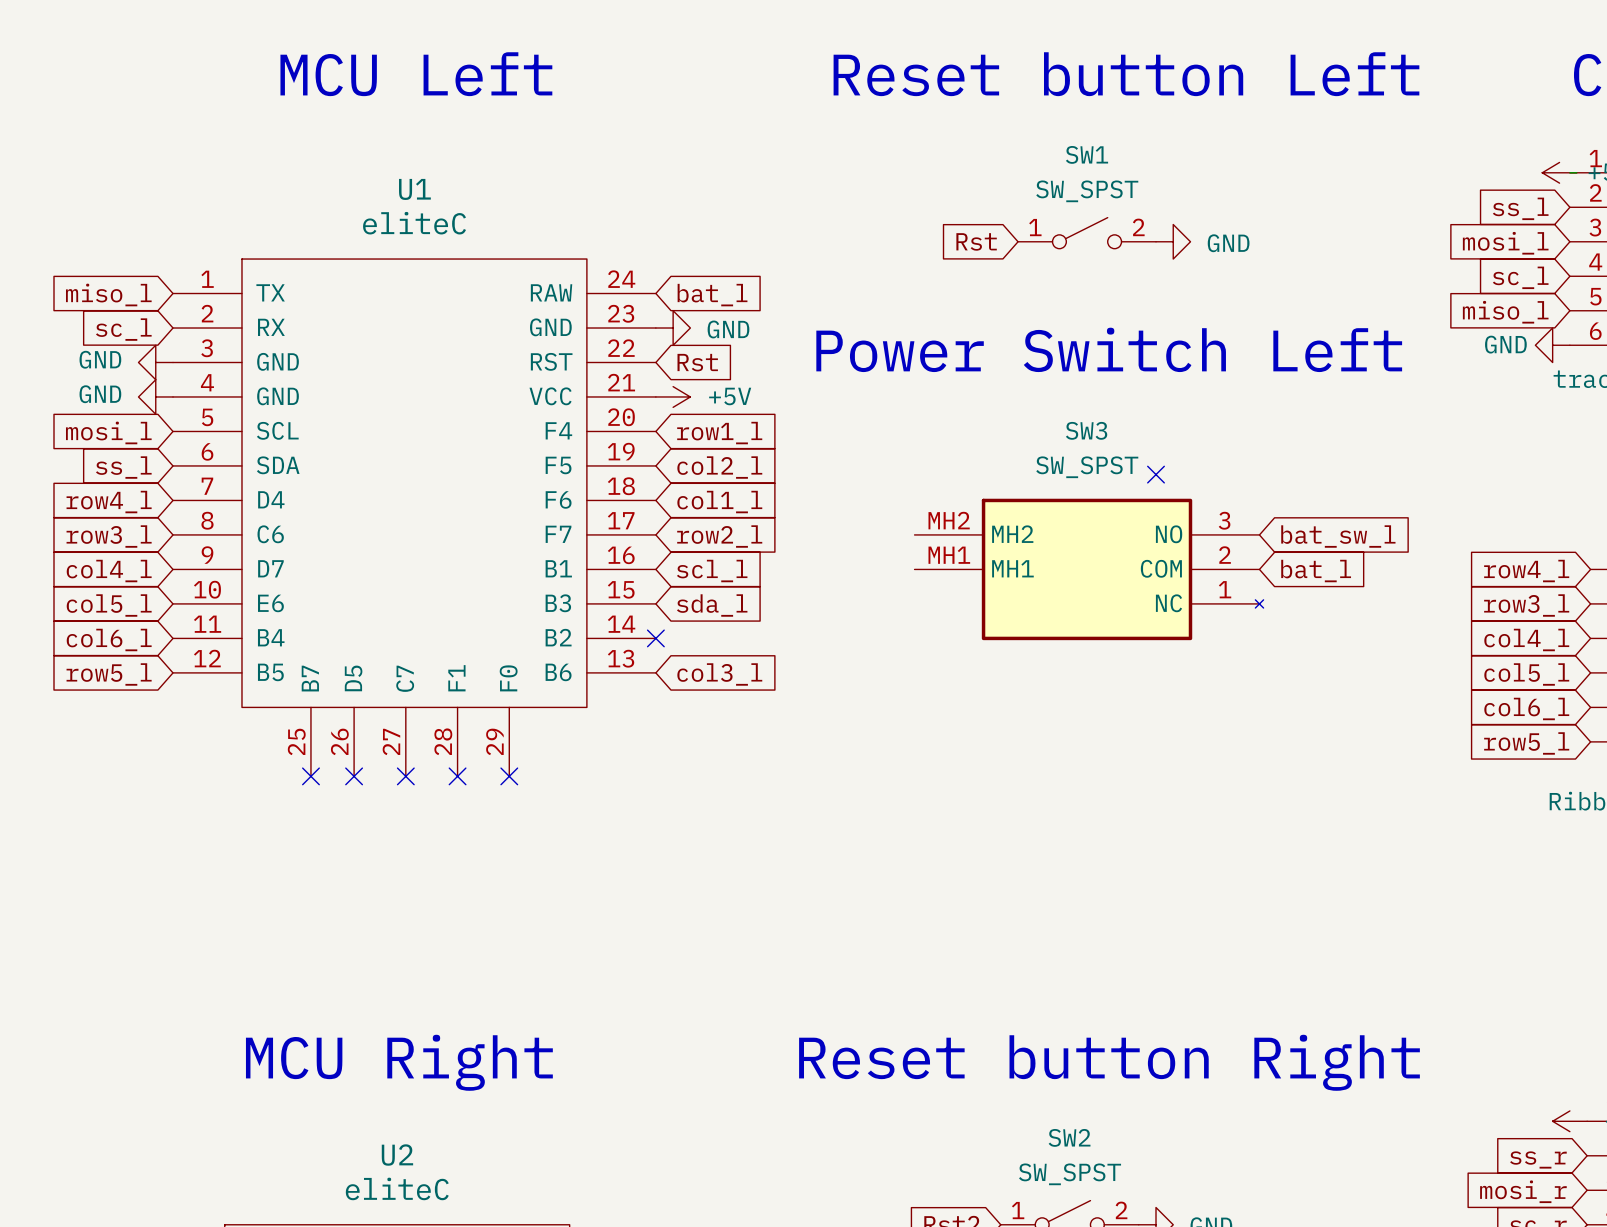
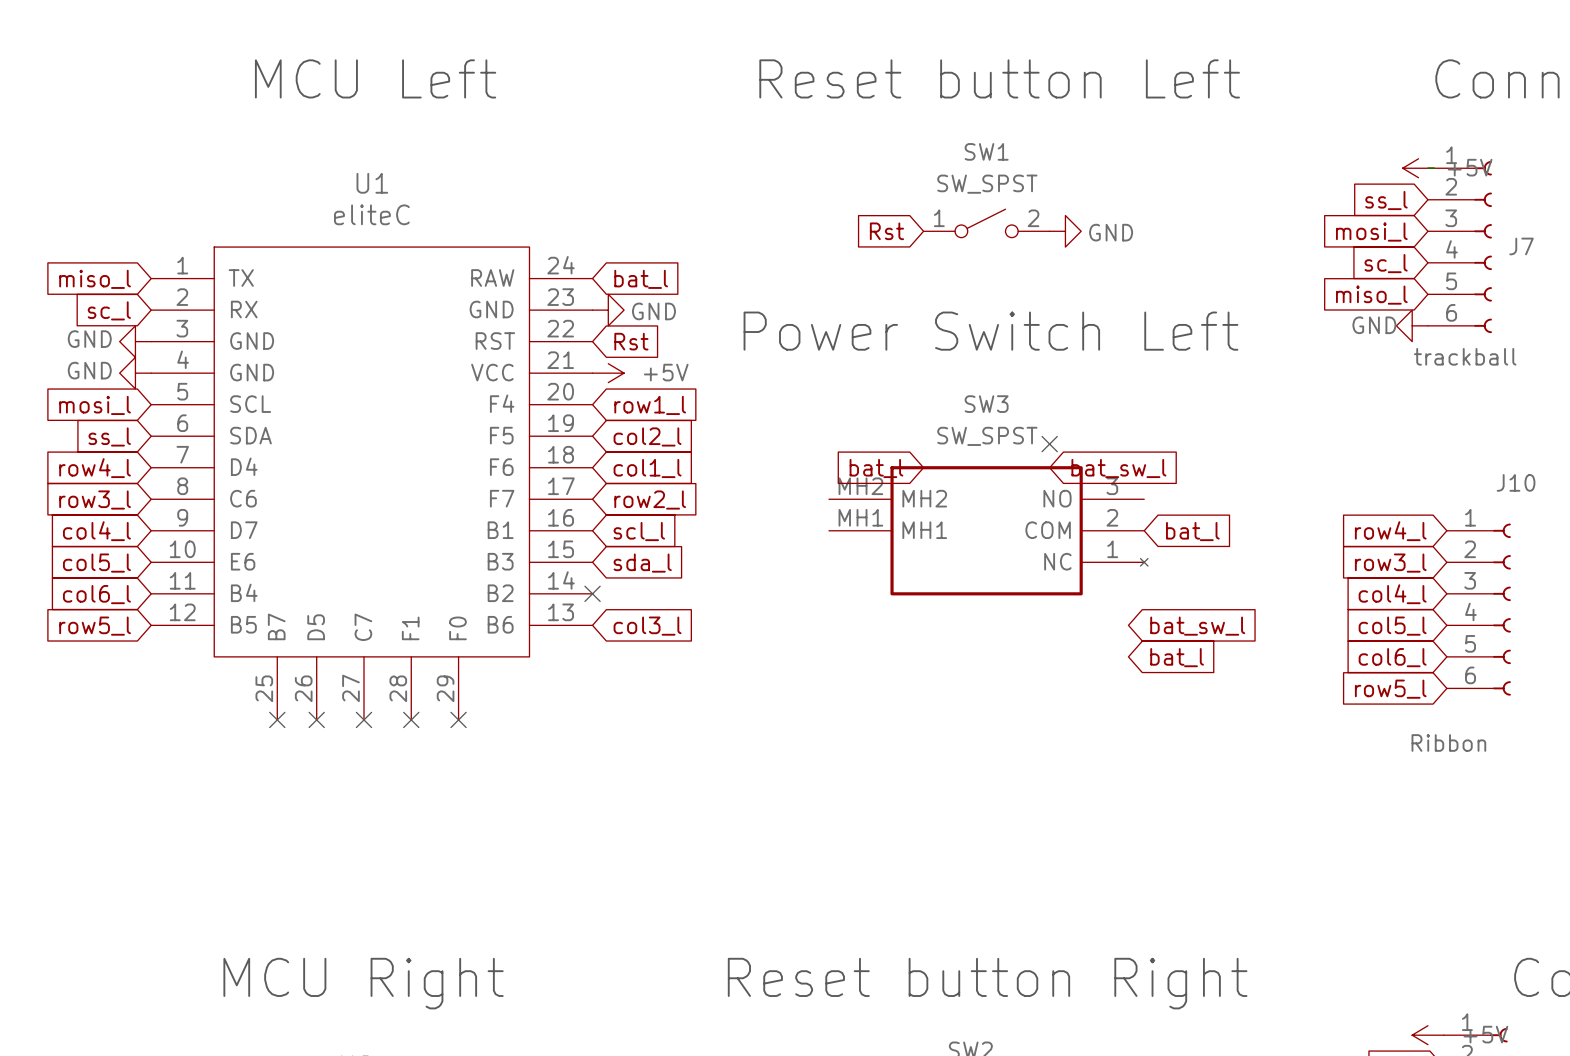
global label: none -> bat_l (876, 468)
global label position: bat_sw_l (1338, 536) -> bat_sw_l (1118, 468)
global label: none -> bat_sw_l (1197, 626)
global label: none -> bat_l (1177, 657)

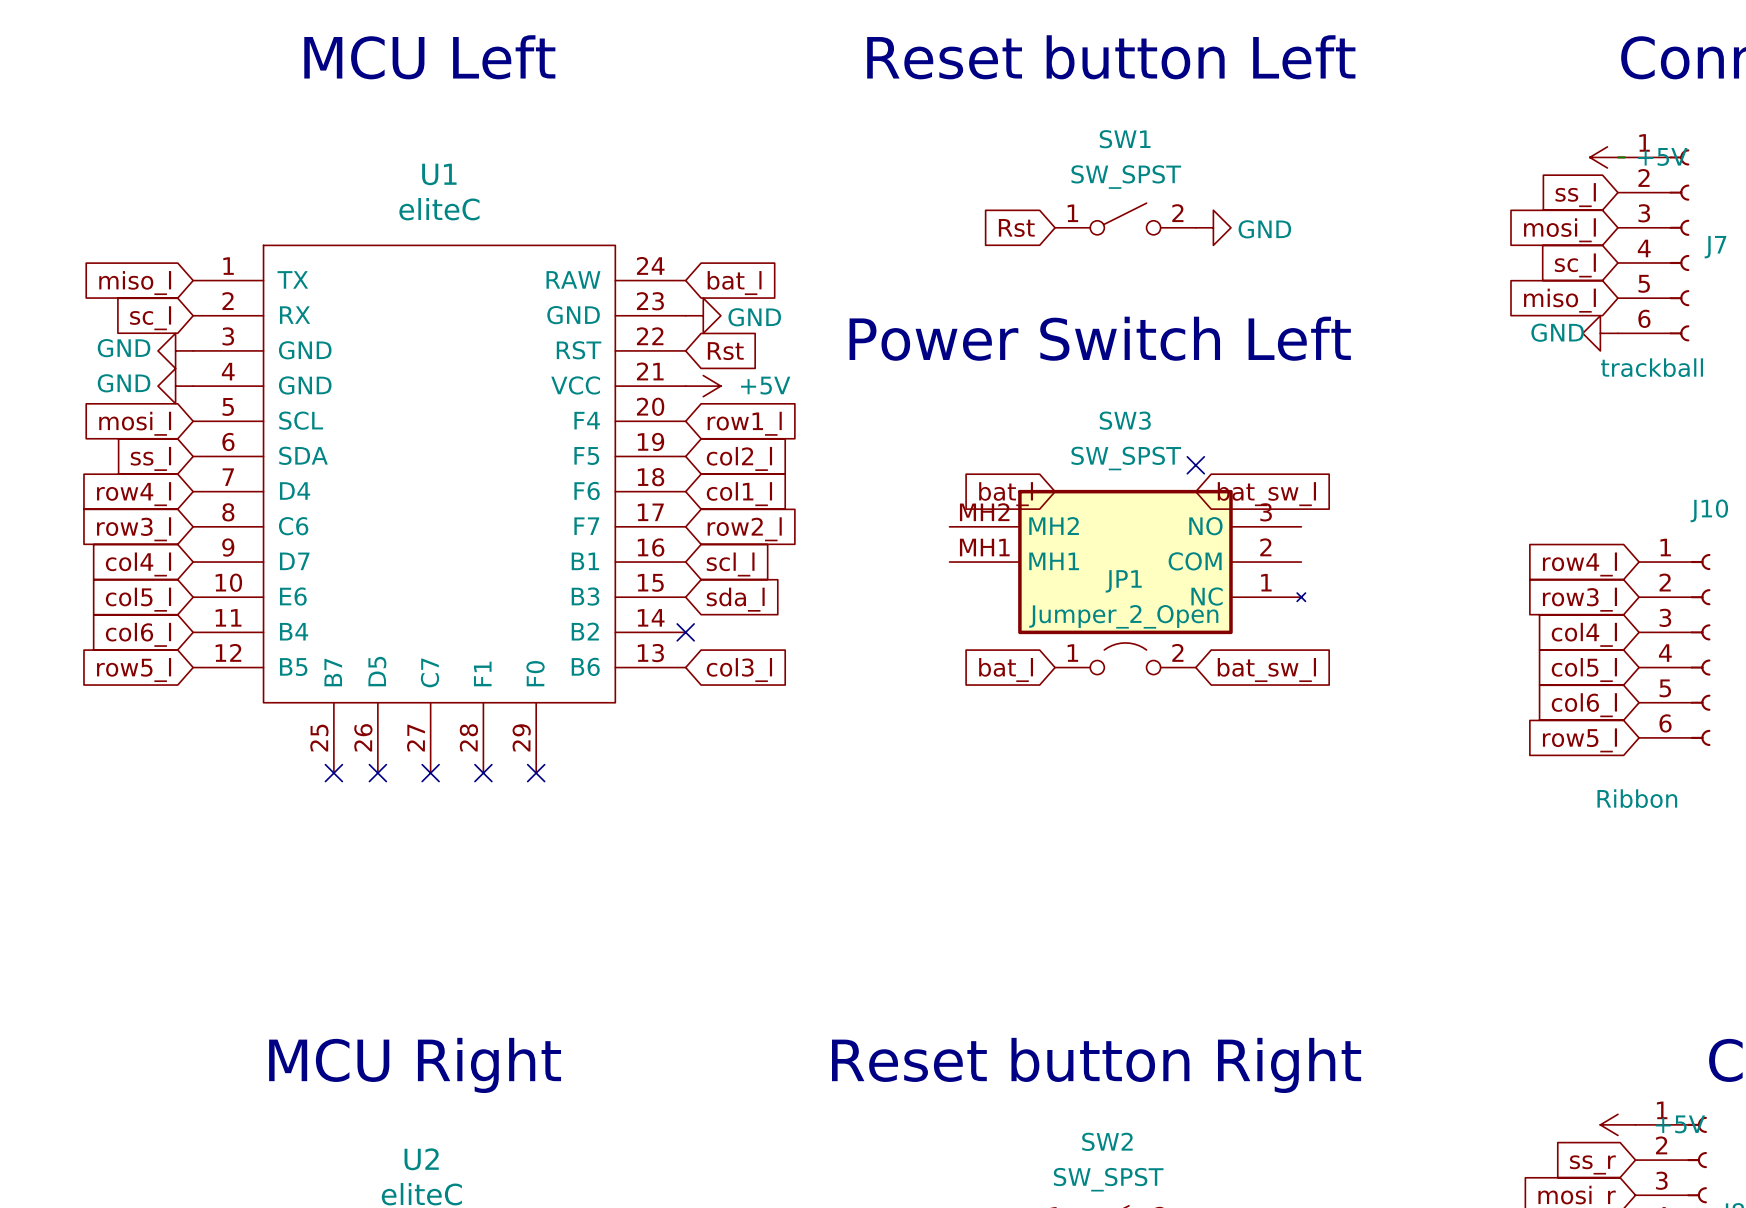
global label: bat_l (1192, 531) -> none
JP1: none -> Jumper_2_Open (1125, 658)
global label: none -> bat_l (1006, 670)
global label position: bat_sw_l (1197, 626) -> bat_sw_l (1266, 670)
global label: bat_l (1177, 657) -> none

